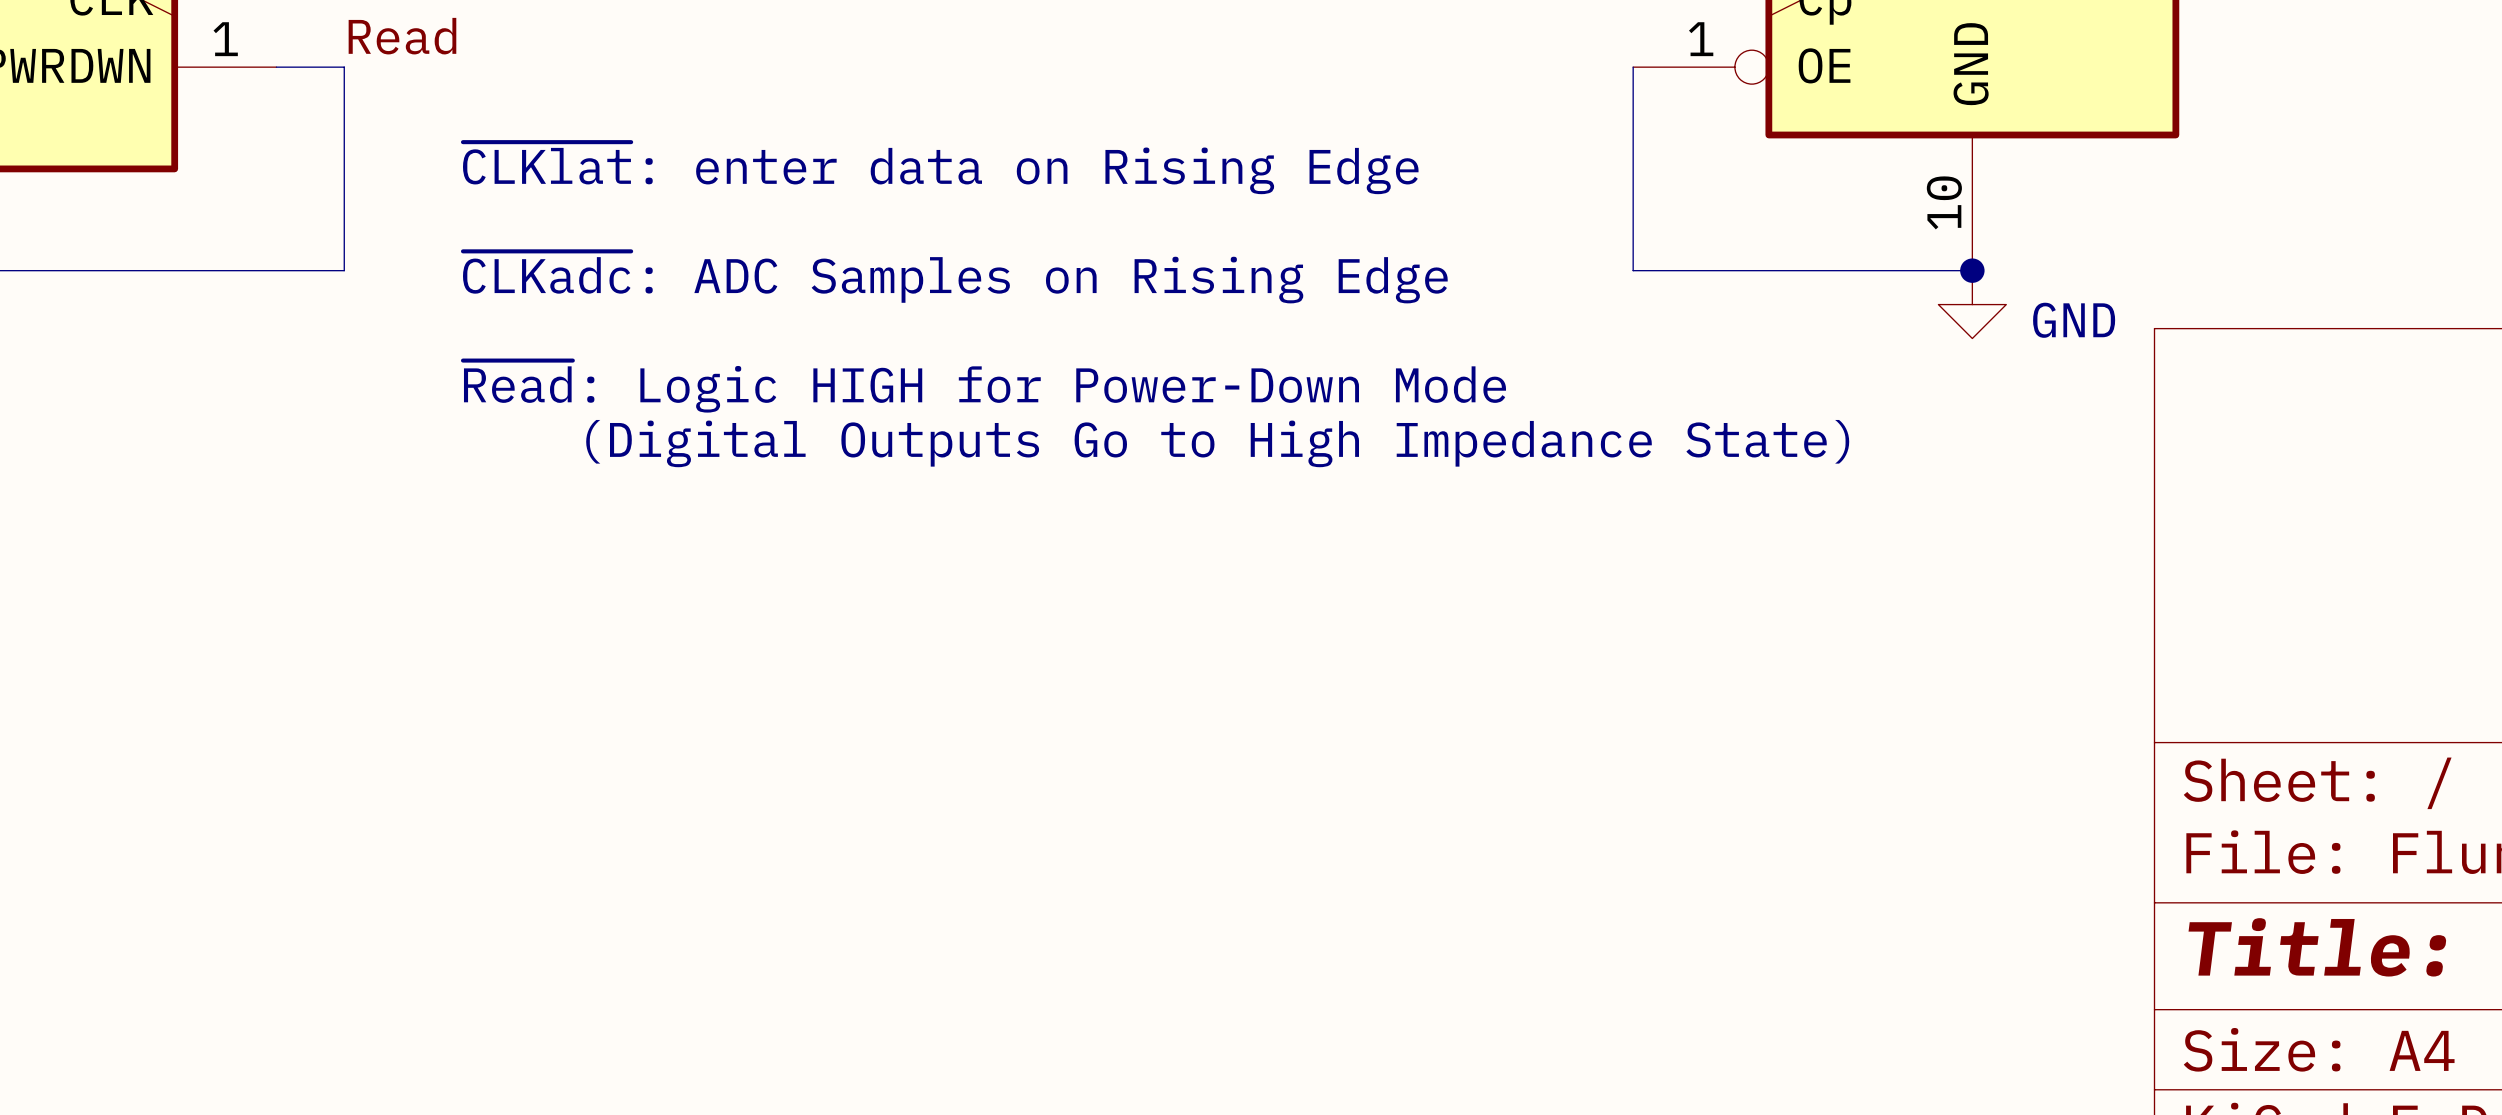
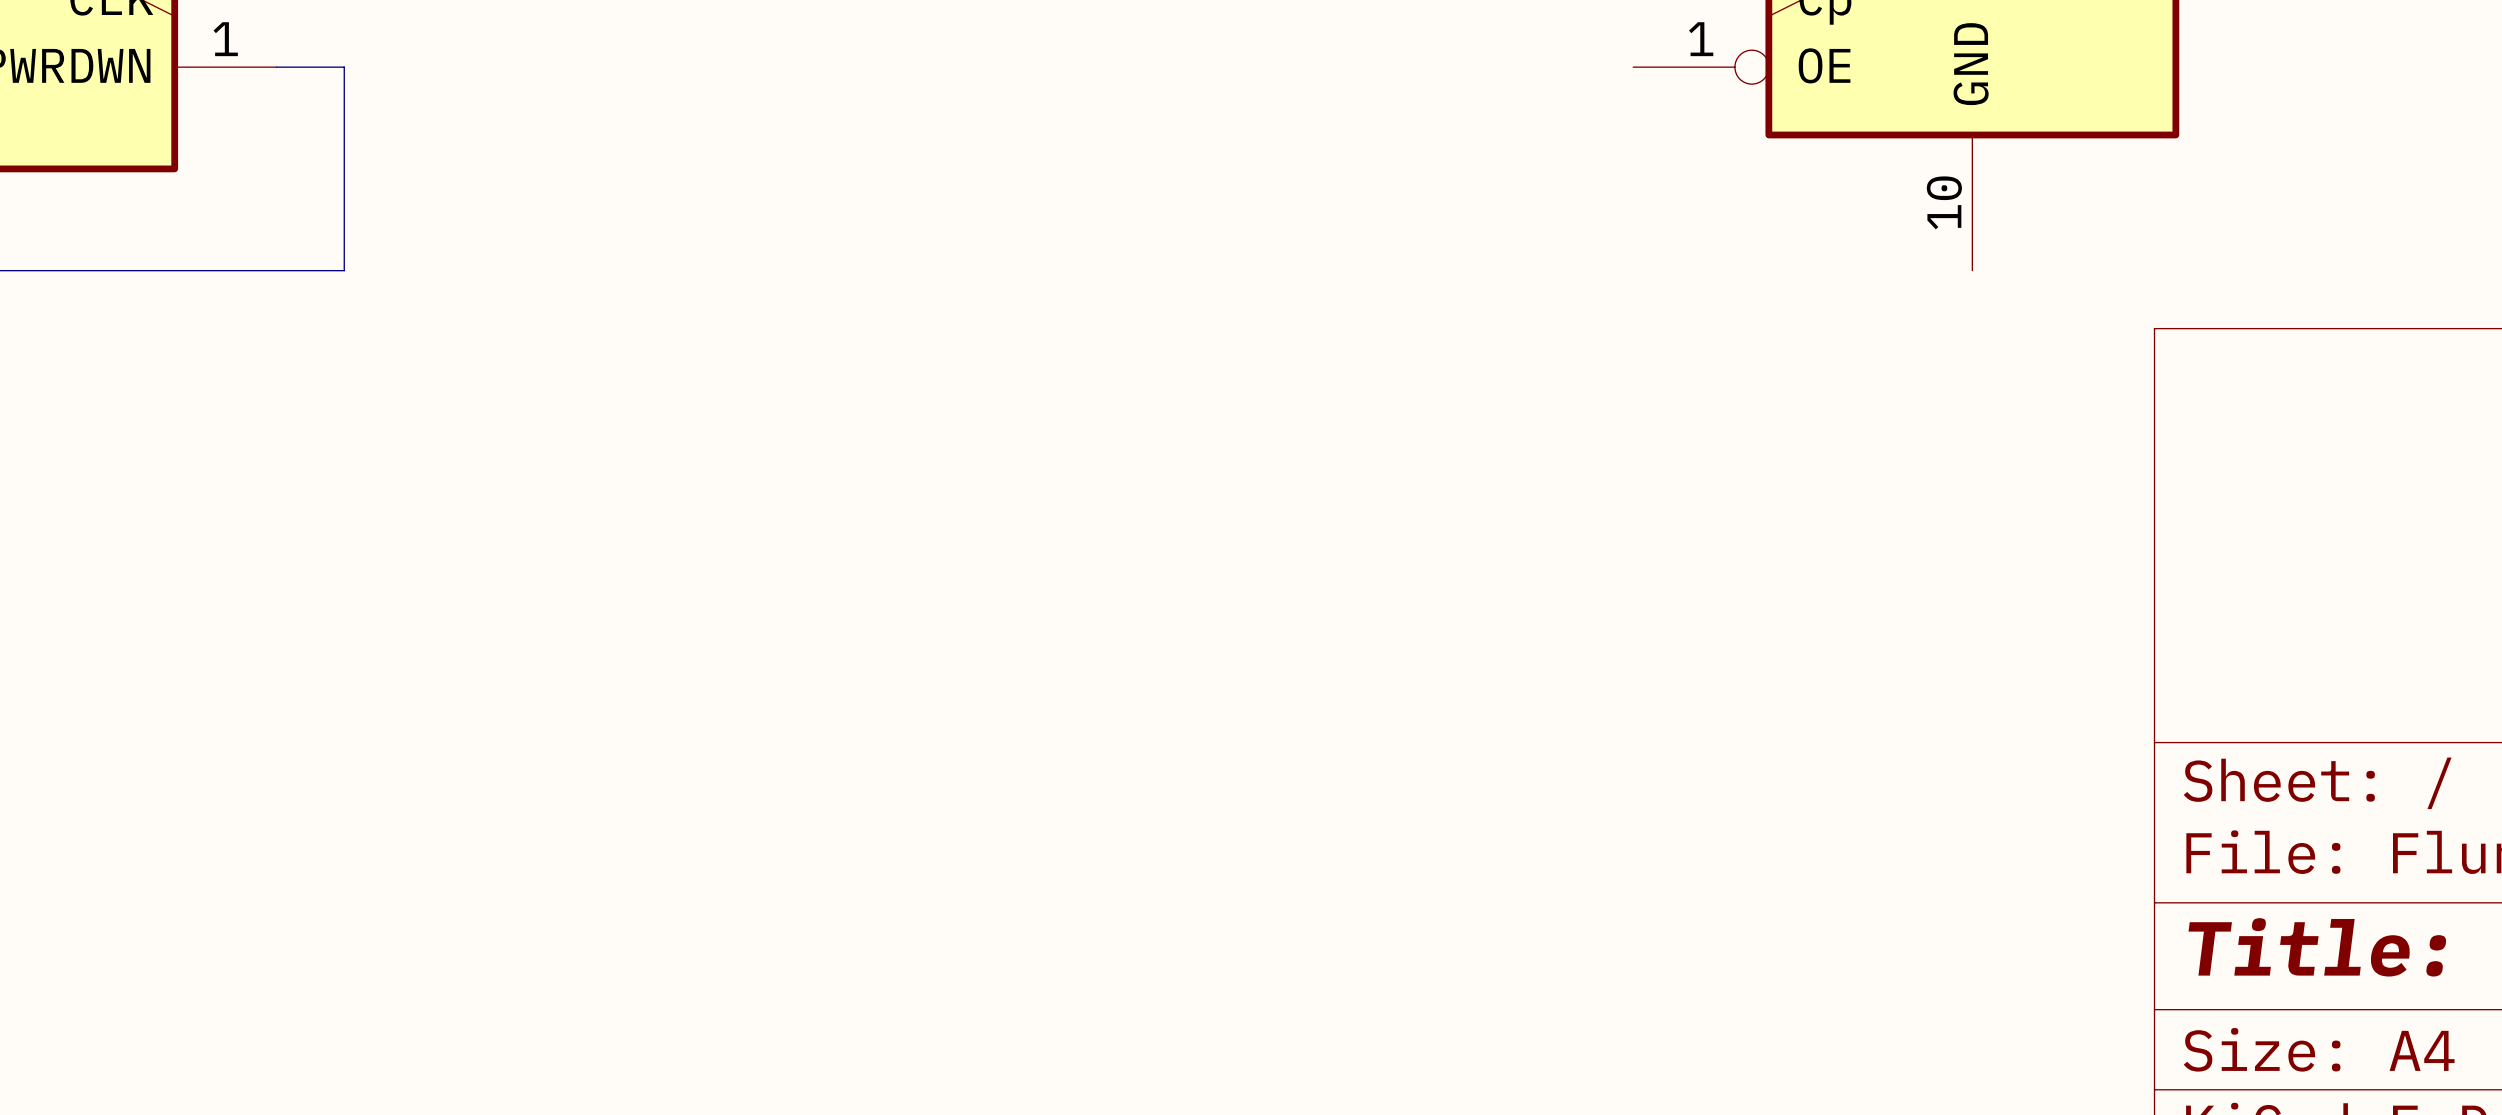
label: Read (402, 36) -> none
wire: (1633, 67) (1633, 270) (1972, 270) -> none
text: ~{CLKlat}: enter data on Rising Edge (940, 168) -> none
junction: (1972, 270) -> none
text: ~{CLKadc}: ADC Samples on Rising Edge (955, 277) -> none
power symbol: GND (1972, 304) -> none
text: ~{Read}: Logic HIGH for Power-Down Mode (984, 386) -> none
text: (Digital Outputs Go to High Impedance State) (1217, 443) -> none

